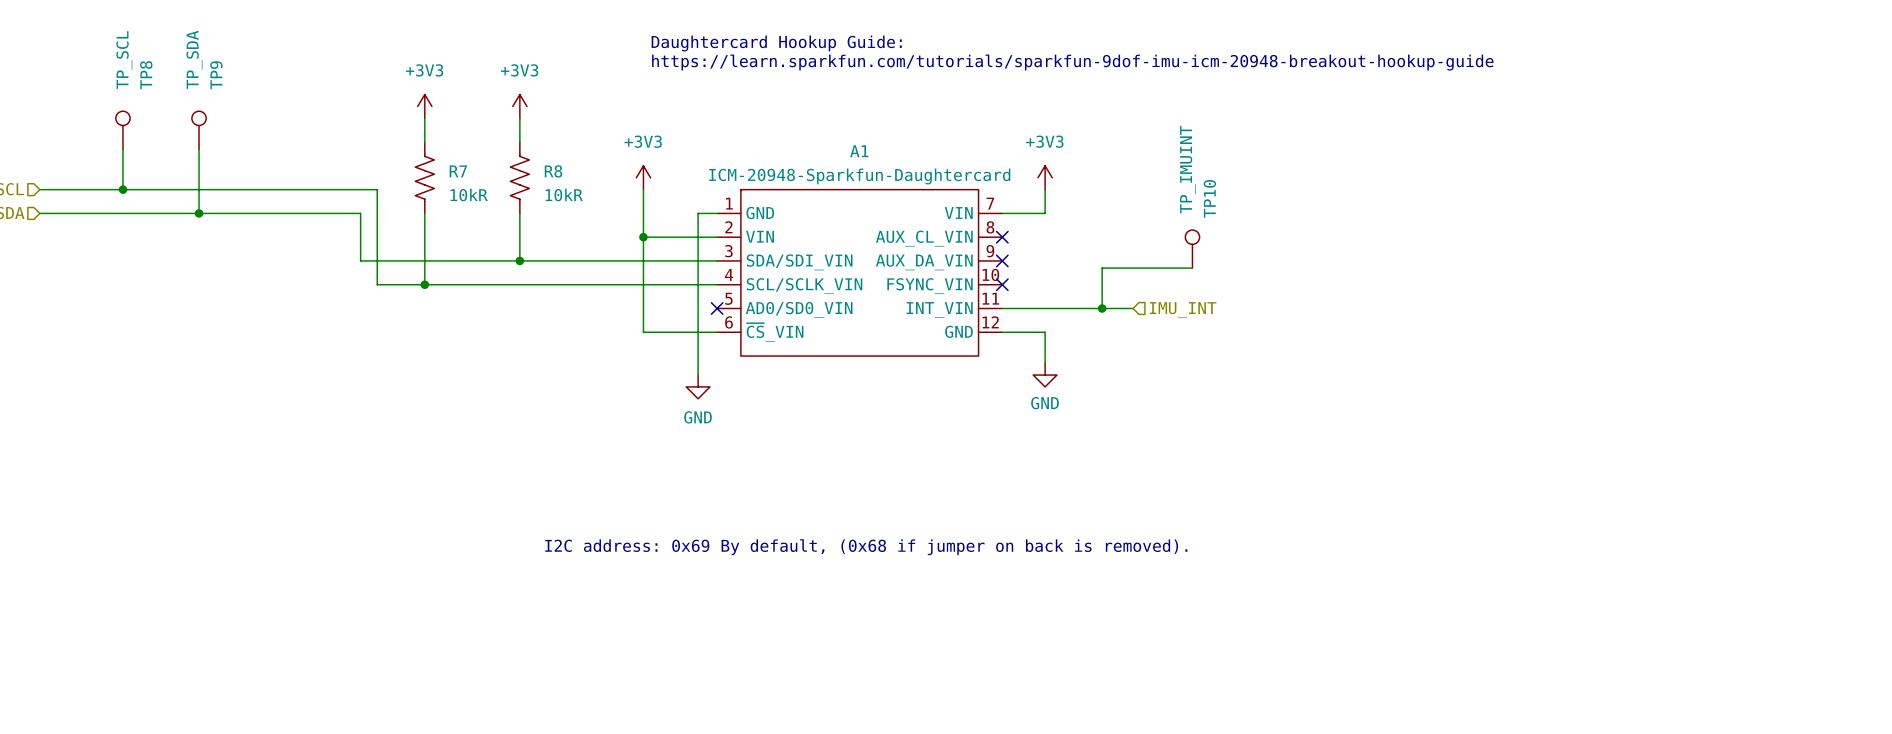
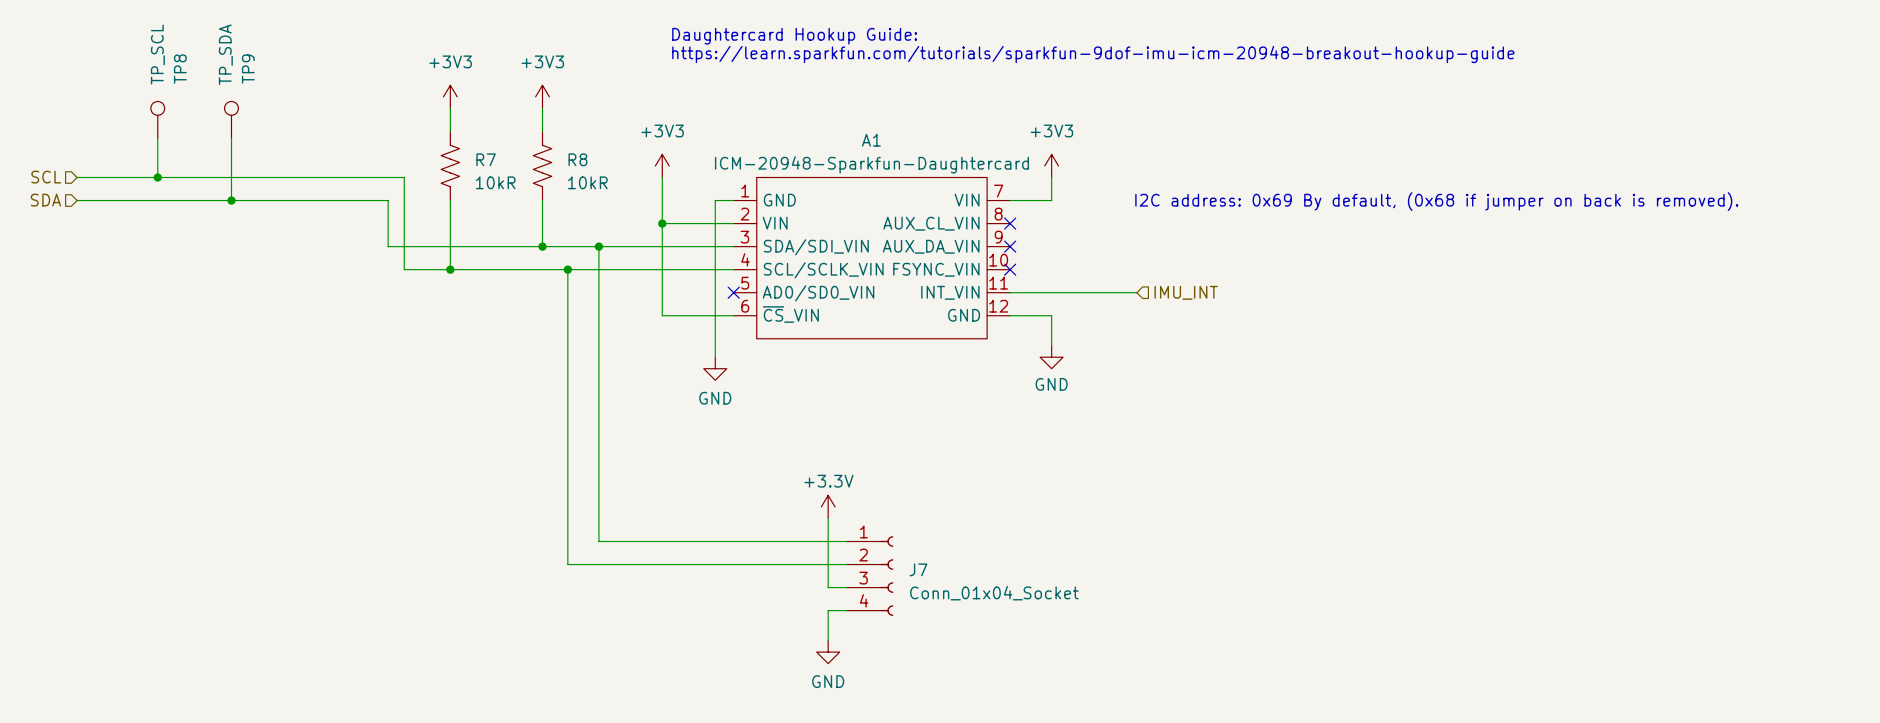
text: none -> I2C address: 0x69 By default, (0x68 if jumper on back is removed). (1436, 201)
TP10: TP_IMUINT (1192, 249) -> none
wire: none -> (598, 246) (598, 541) (846, 541)
junction: none -> (598, 246)
wire: (1192, 268) (1102, 268) (1102, 308) -> none
wire: none -> (567, 269) (567, 564) (846, 564)
junction: none -> (567, 269)
junction: (1102, 308) -> none
power symbol: none -> +3.3V (828, 506)
wire: none -> (828, 518) (828, 587) (846, 587)
text: I2C address: 0x69 By default, (0x68 if jumper on back is removed). (866, 547) -> none
J7: none -> Conn_01x04_Socket (869, 576)
wire: none -> (846, 610) (828, 610) (828, 640)
power symbol: none -> GND (828, 652)

